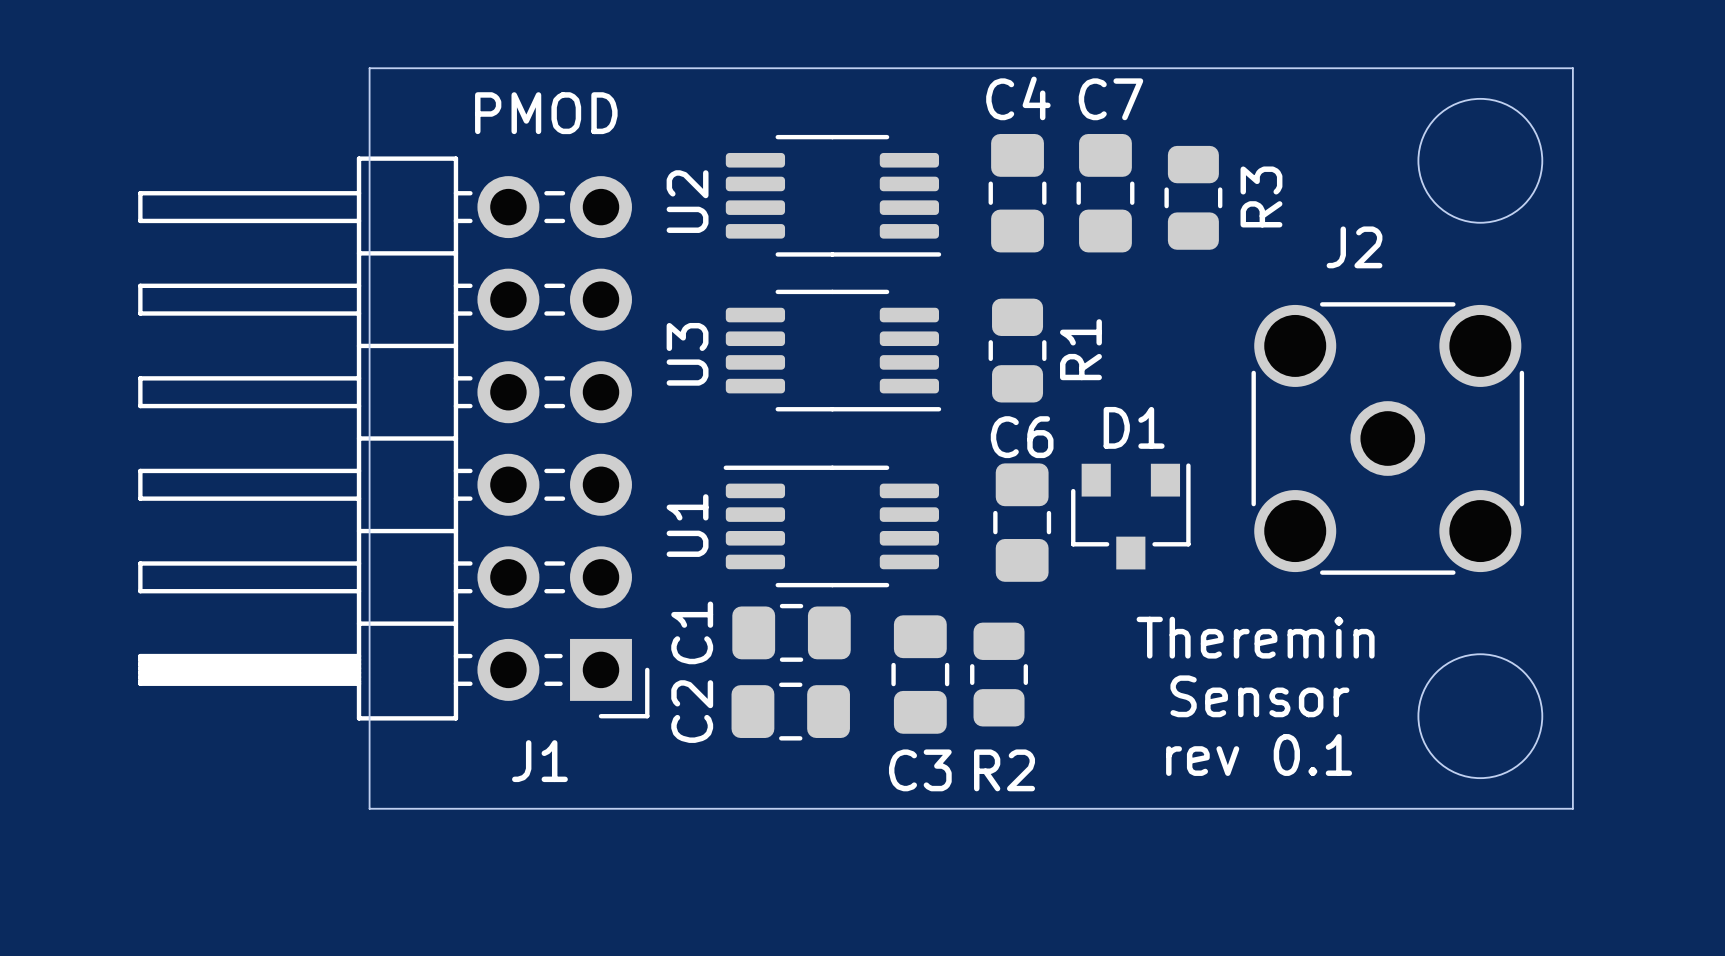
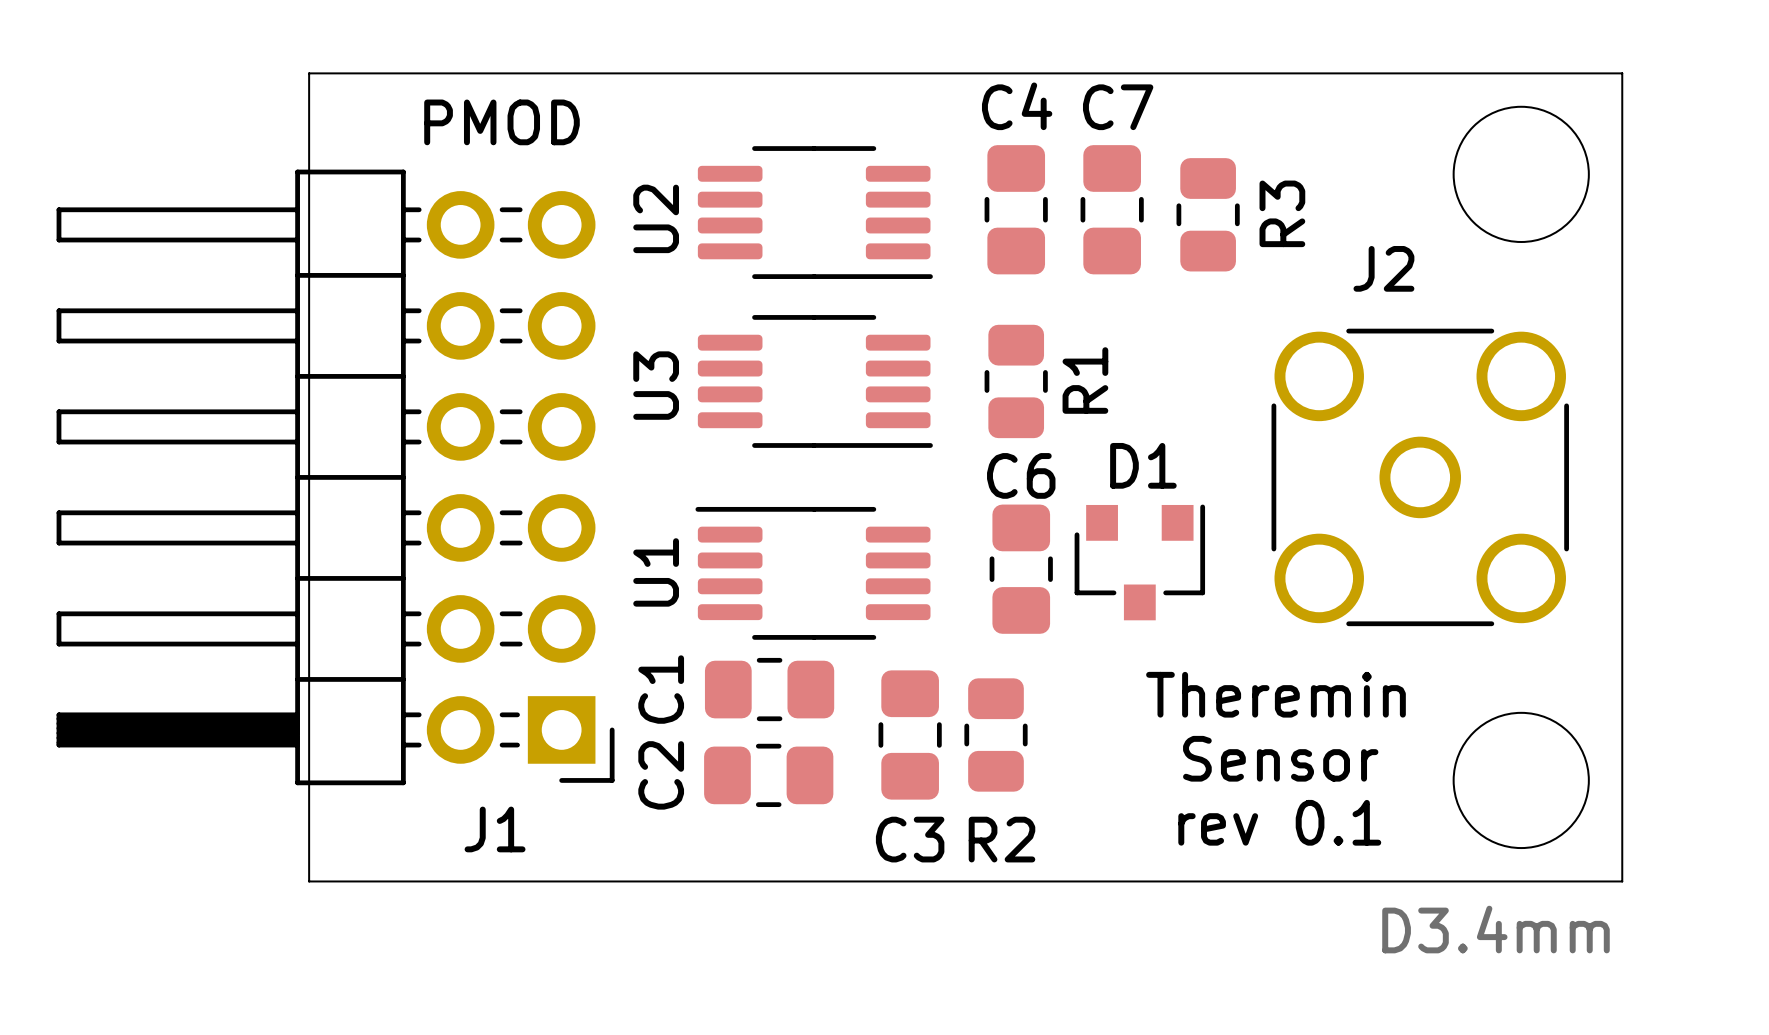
text: none -> D3.4mm (1496, 929)

